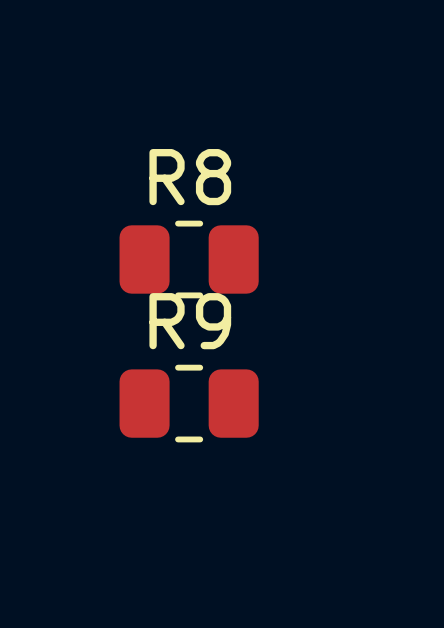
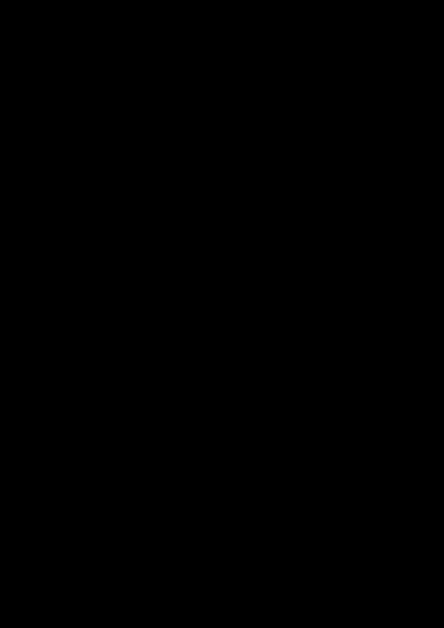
R8: (189, 259) -> none
R9: (189, 403) -> none

